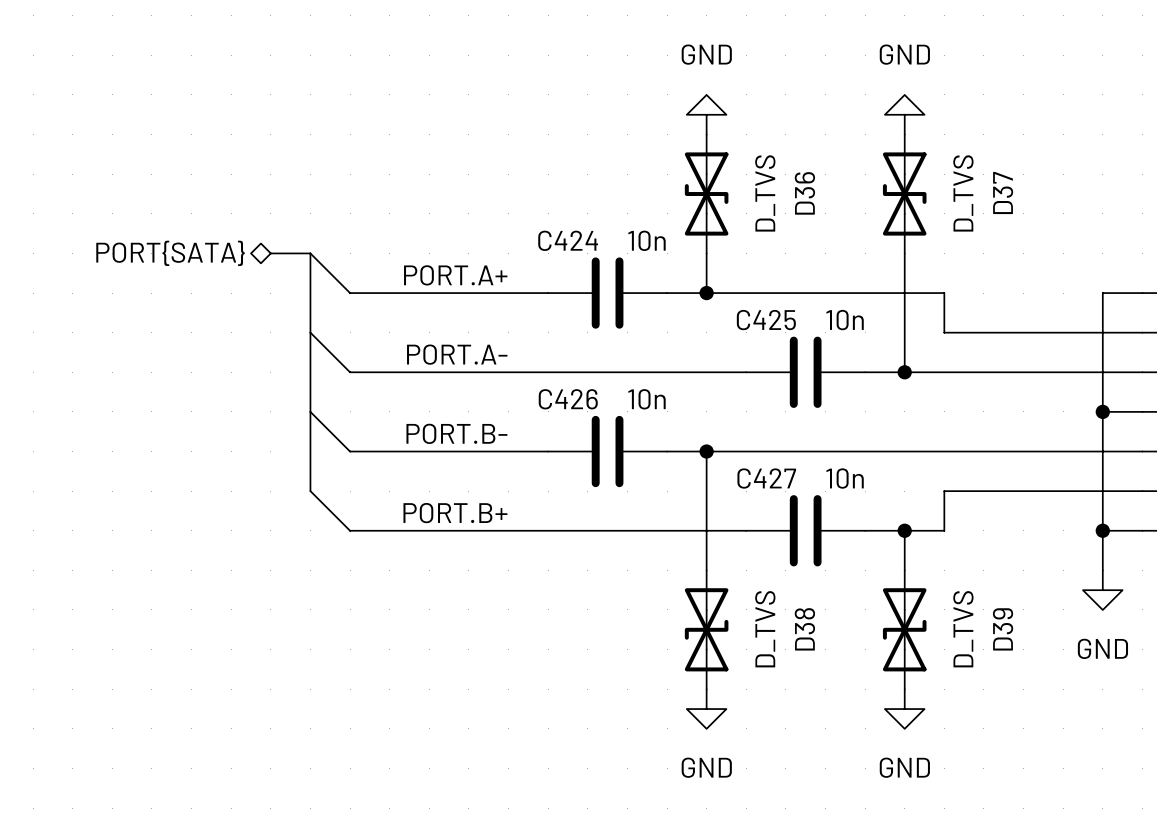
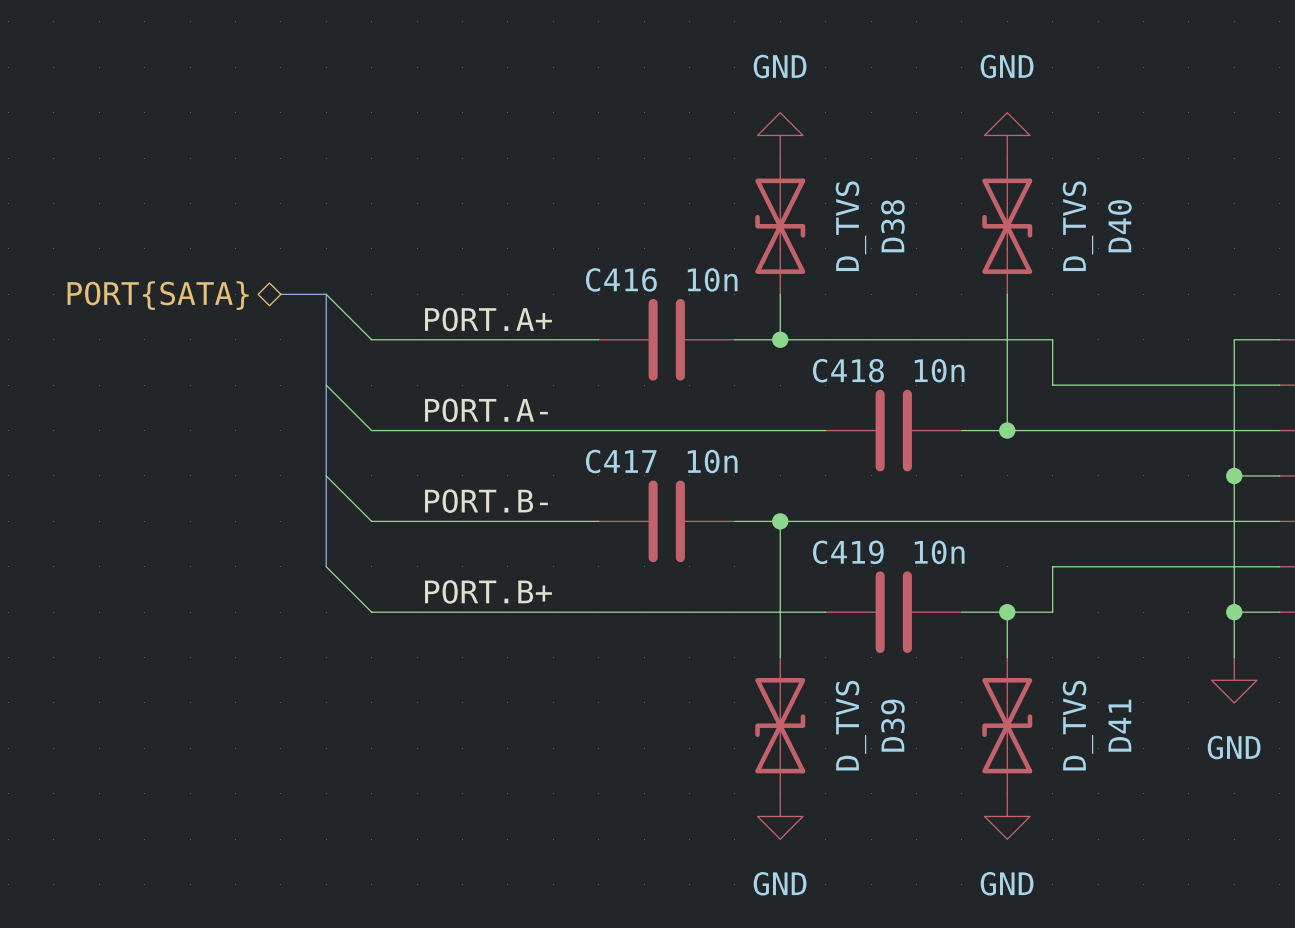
D37 name: D37 (1003, 192) -> D40 (1119, 226)
D36 name: D36 (804, 193) -> D38 (892, 226)
C424 name: C424 (568, 240) -> C416 (621, 279)
C425 name: C425 (766, 320) -> C418 (848, 370)
C426 name: C426 (568, 399) -> C417 (621, 461)
C427 name: C427 (766, 478) -> C419 (848, 552)
D38 name: D38 (804, 629) -> D39 (892, 725)
D39 name: D39 (1003, 629) -> D41 (1119, 725)

